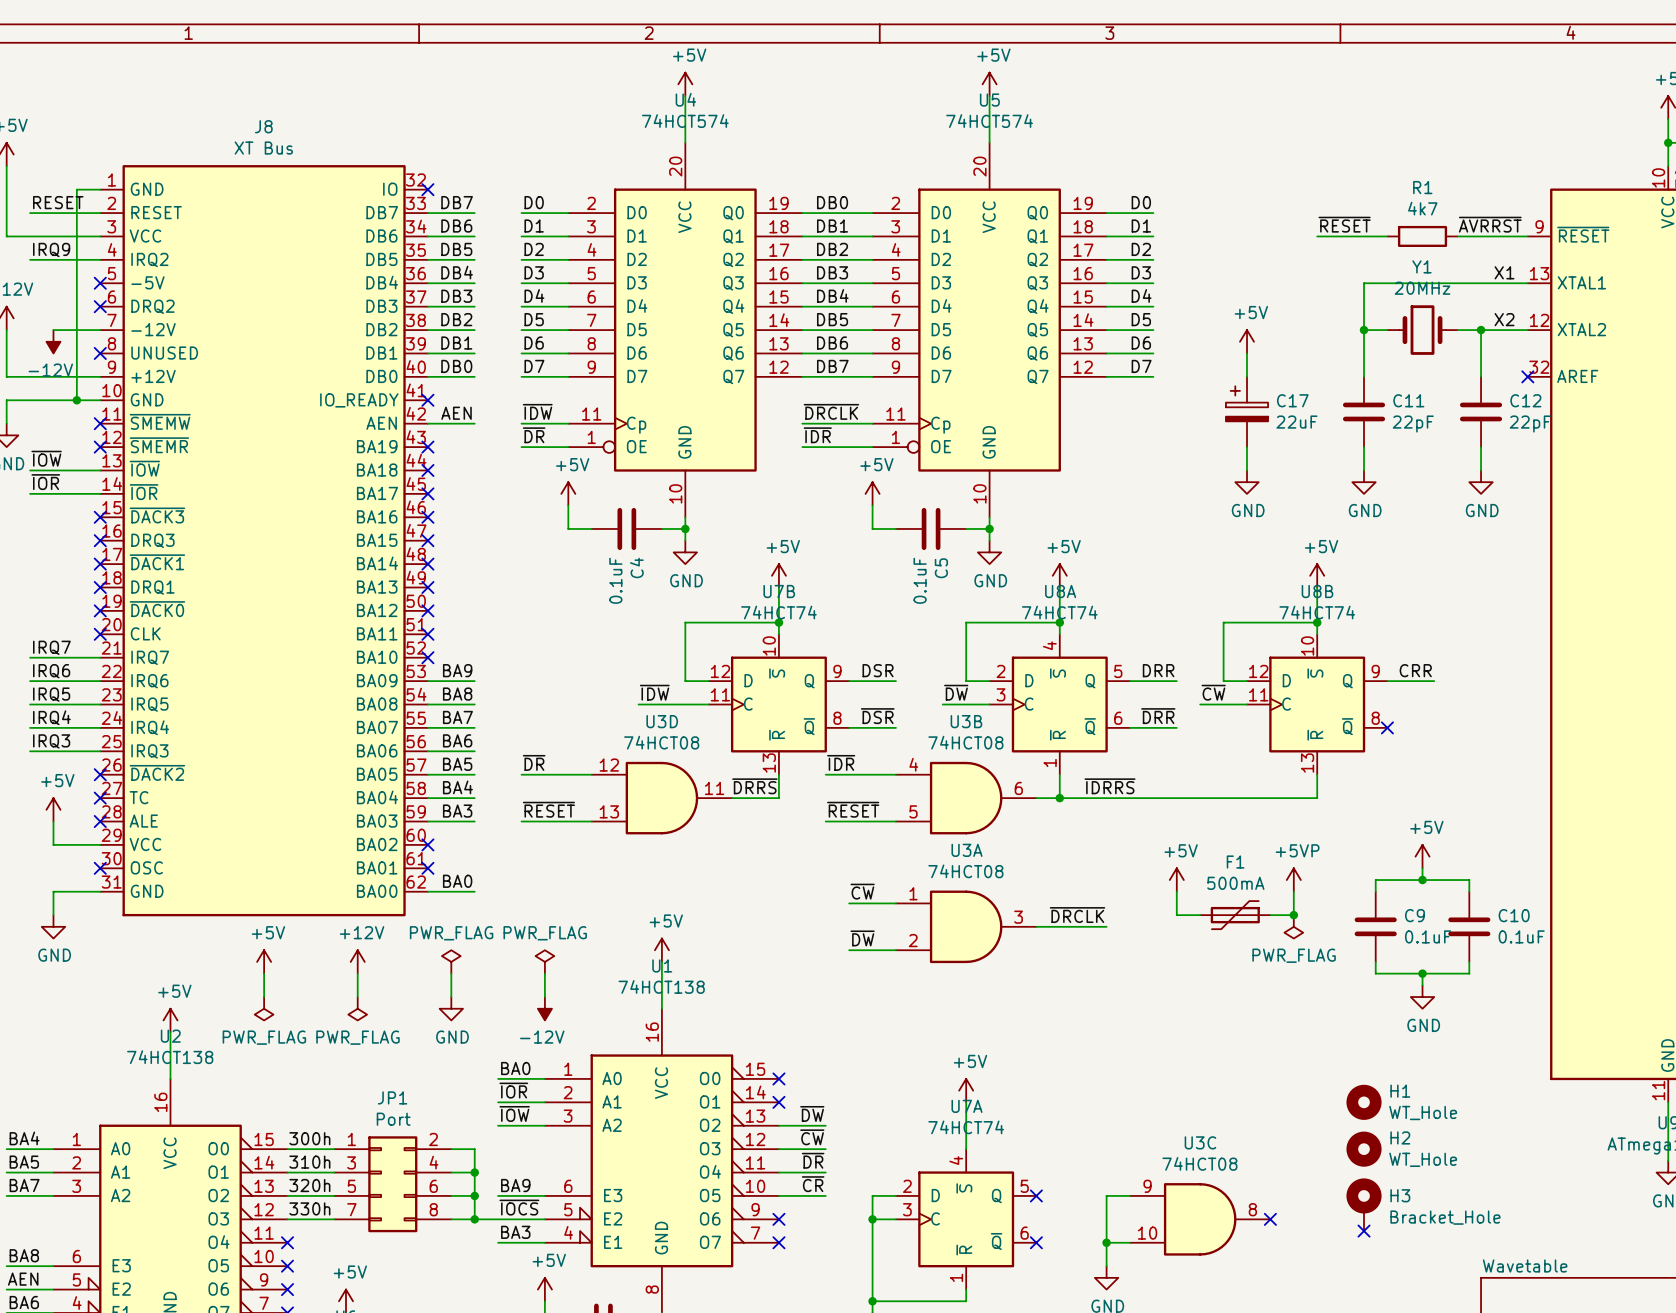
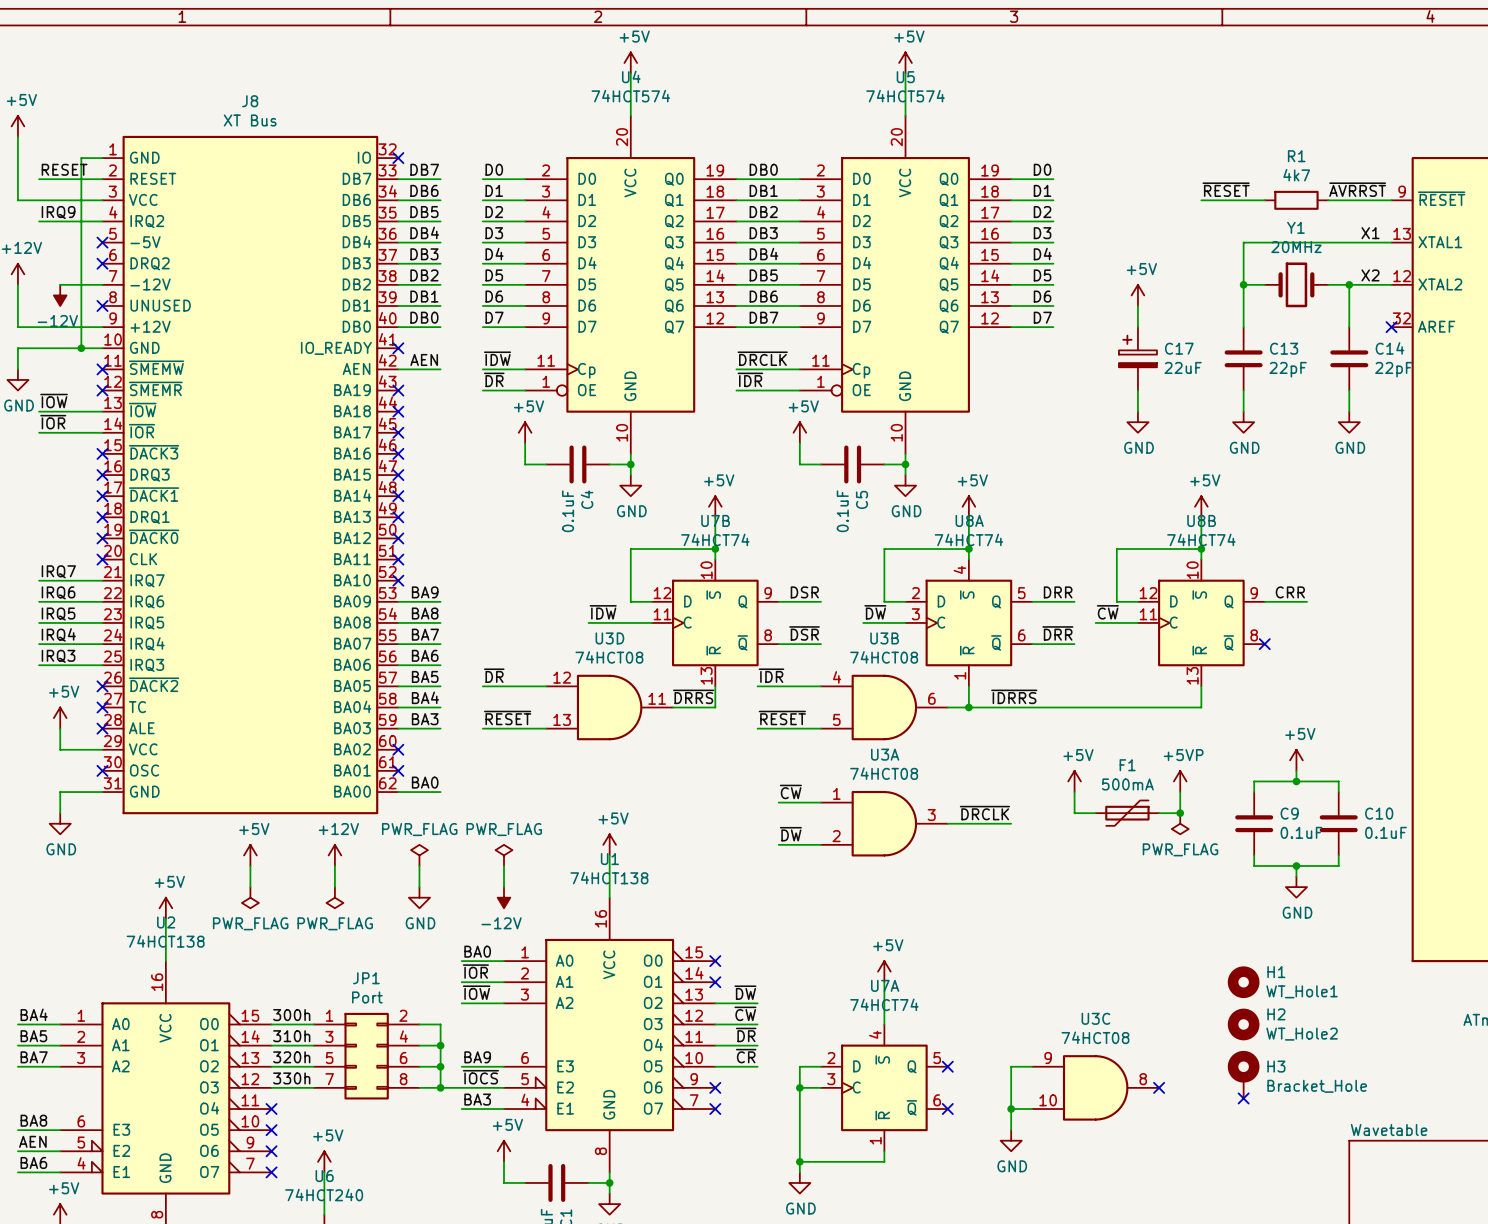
C11 name: C11 (1408, 400) -> C13 (1284, 348)
C12 name: C12 (1525, 400) -> C14 (1390, 348)
H1 value: WT_Hole (1423, 1113) -> WT_Hole1 (1302, 991)
H2 value: WT_Hole (1423, 1159) -> WT_Hole2 (1302, 1034)

